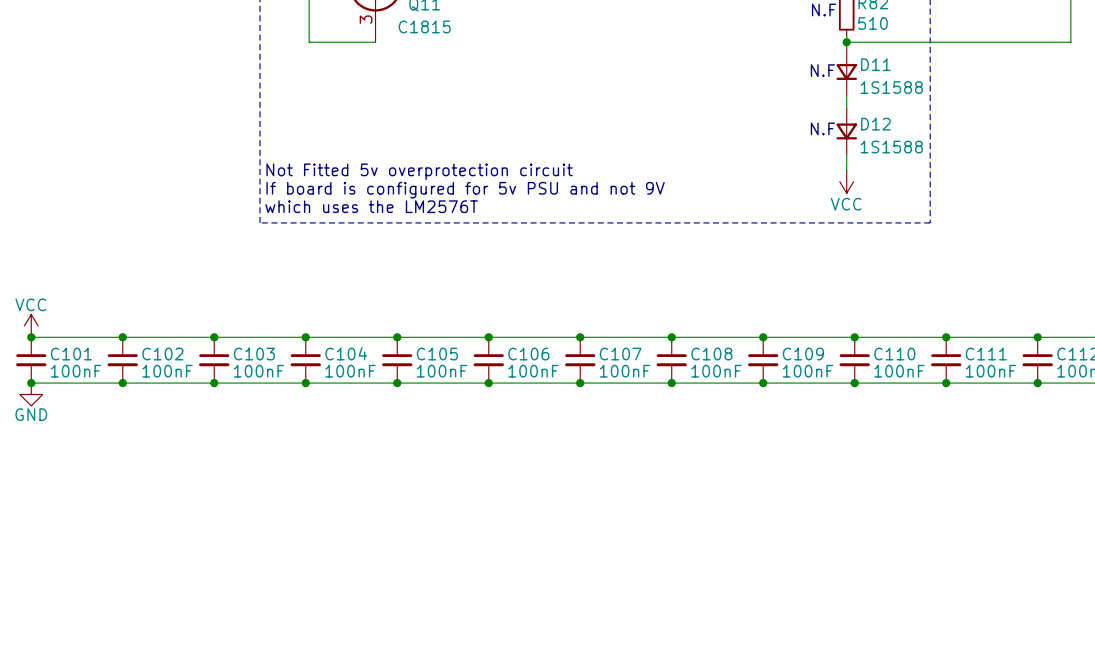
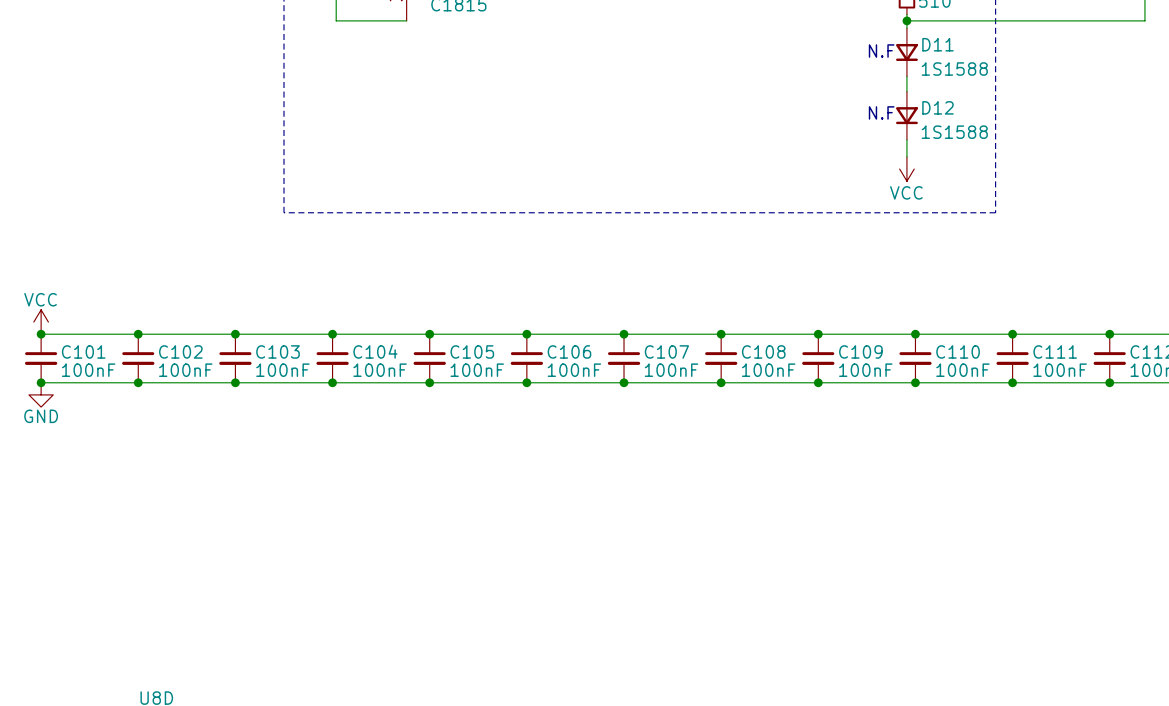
text: Not Fitted 5v overprotection circuit (419, 171) -> none
text: If board is configured for 5v PSU and not 9V (465, 190) -> none
text: which uses the LM2576T (371, 206) -> none

